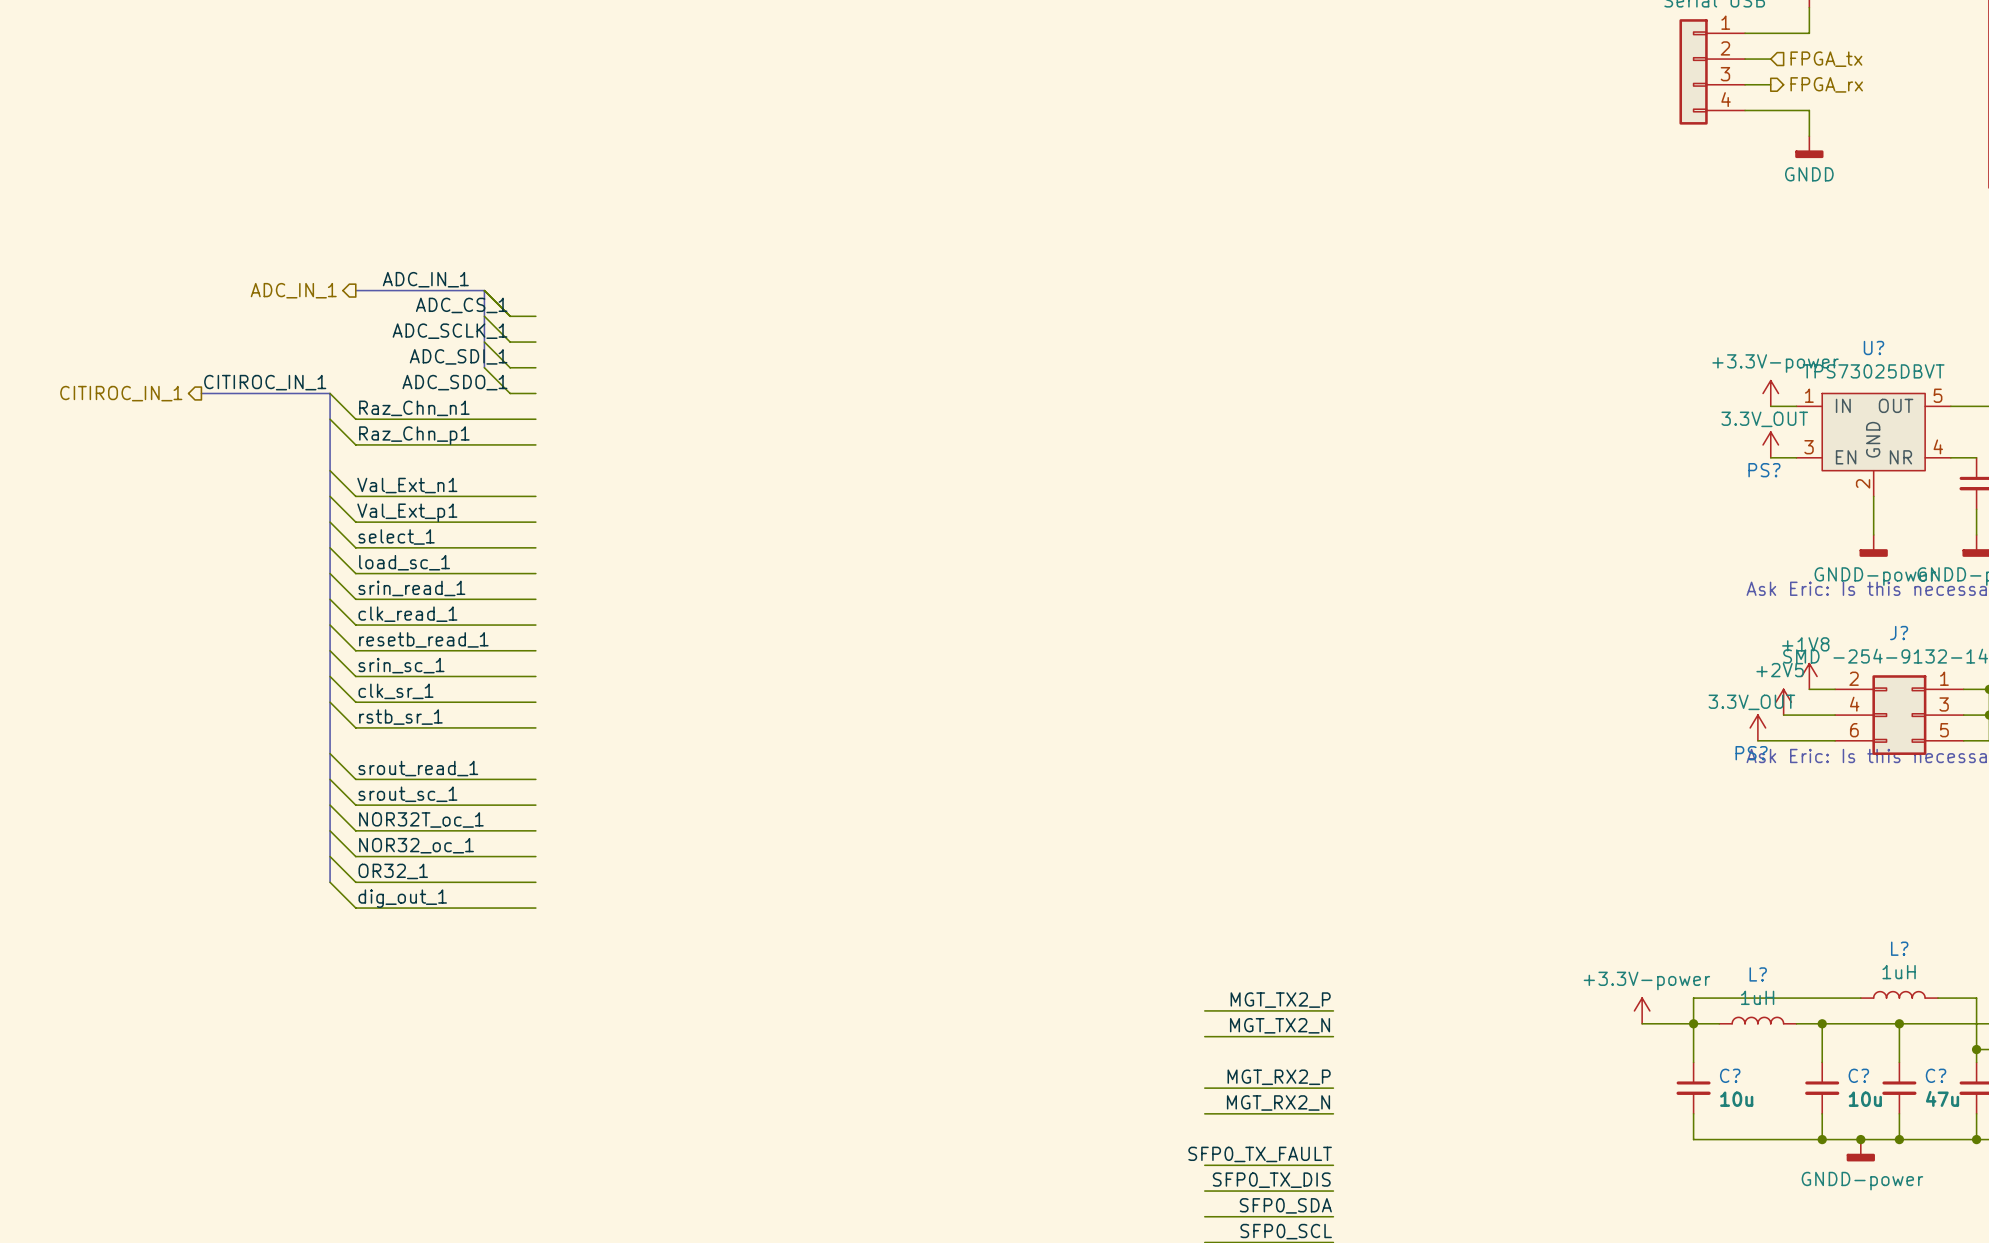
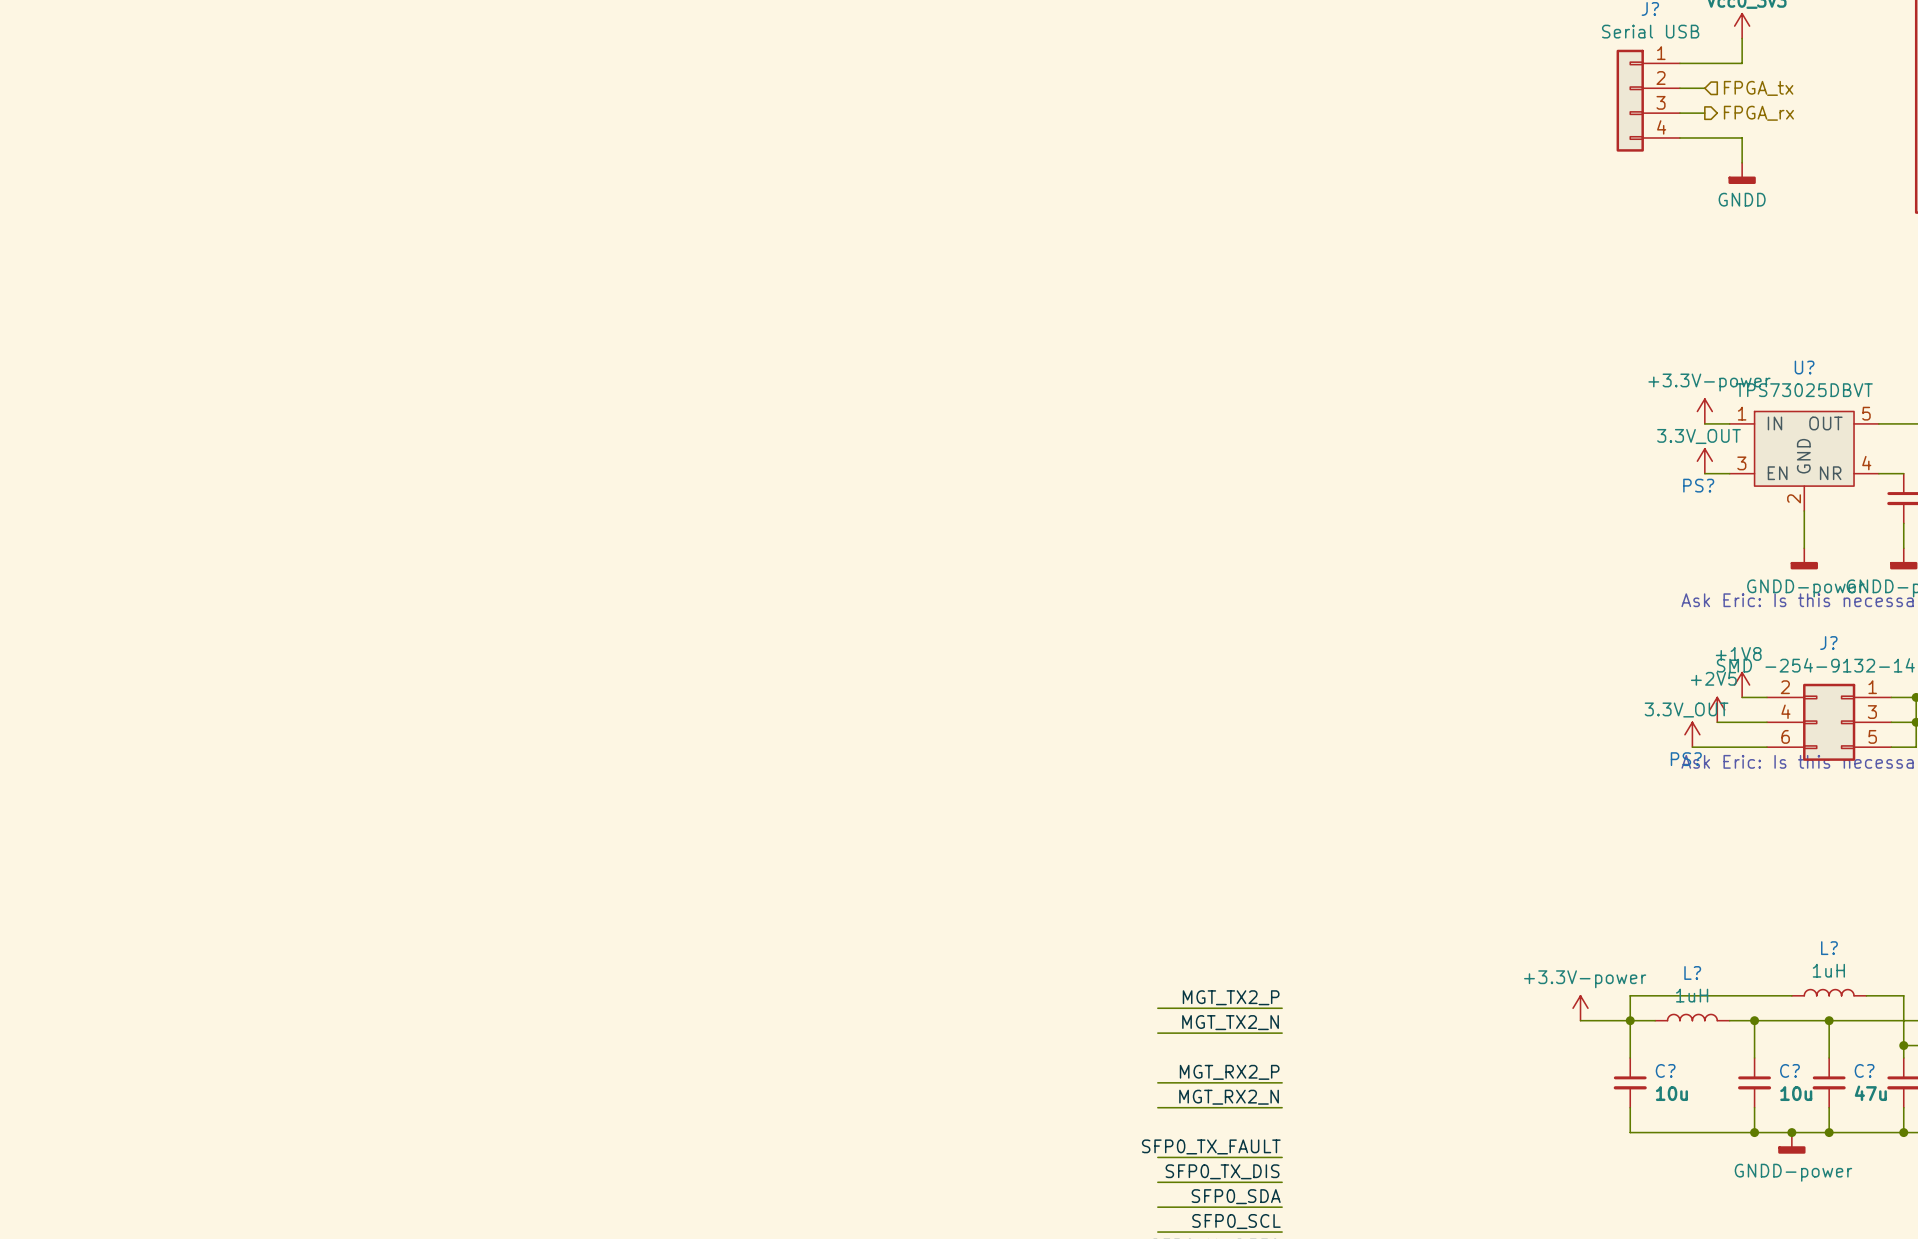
label: ADC_IN_1 (425, 279) -> none
hierarchical label: ADC_IN_1 (293, 290) -> none
bus: (355, 290) (484, 290) (484, 367) -> none
wire: (484, 290) (510, 316) (535, 316) -> none
label: ADC_CS_1 (461, 305) -> none
wire: (484, 316) (510, 342) (535, 342) -> none
label: ADC_SCLK_1 (450, 331) -> none
wire: (484, 342) (510, 367) (535, 367) -> none
label: ADC_SDI_1 (458, 356) -> none
wire: (484, 367) (510, 393) (535, 393) -> none
label: CITIROC_IN_1 (265, 382) -> none
label: ADC_SDO_1 (454, 382) -> none
hierarchical label: CITIROC_IN_1 (121, 393) -> none
bus: (201, 393) (330, 393) (330, 882) -> none
wire: (330, 393) (355, 419) (535, 419) -> none
label: Raz_Chn_n1 (414, 408) -> none
wire: (330, 419) (355, 444) (535, 444) -> none
label: Raz_Chn_p1 (414, 435) -> none
wire: (330, 470) (355, 496) (535, 496) -> none
label: Val_Ext_n1 (407, 485) -> none
wire: (330, 496) (355, 522) (535, 522) -> none
label: Val_Ext_p1 (407, 512) -> none
wire: (330, 522) (355, 547) (535, 547) -> none
label: select_1 (396, 536) -> none
wire: (330, 547) (355, 573) (535, 573) -> none
label: load_sc_1 (404, 562) -> none
wire: (330, 573) (355, 599) (535, 599) -> none
label: srin_read_1 (411, 588) -> none
wire: (330, 599) (355, 625) (535, 625) -> none
label: clk_read_1 (407, 614) -> none
wire: (330, 625) (355, 650) (535, 650) -> none
label: resetb_read_1 (423, 639) -> none
wire: (330, 650) (355, 676) (535, 676) -> none
label: srin_sc_1 (401, 665) -> none
wire: (330, 676) (355, 702) (535, 702) -> none
label: clk_sr_1 (396, 691) -> none
wire: (330, 702) (355, 727) (535, 727) -> none
label: rstb_sr_1 (400, 717) -> none
wire: (330, 753) (355, 779) (535, 779) -> none
label: srout_read_1 (418, 768) -> none
wire: (330, 779) (355, 805) (535, 805) -> none
label: srout_sc_1 (407, 794) -> none
wire: (330, 805) (355, 830) (535, 830) -> none
label: NOR32T_oc_1 (421, 819) -> none
wire: (330, 830) (355, 856) (535, 856) -> none
label: NOR32_oc_1 (416, 845) -> none
wire: (330, 856) (355, 882) (535, 882) -> none
label: OR32_1 (393, 871) -> none
wire: (330, 882) (355, 908) (535, 908) -> none
label: dig_out_1 (402, 898) -> none

